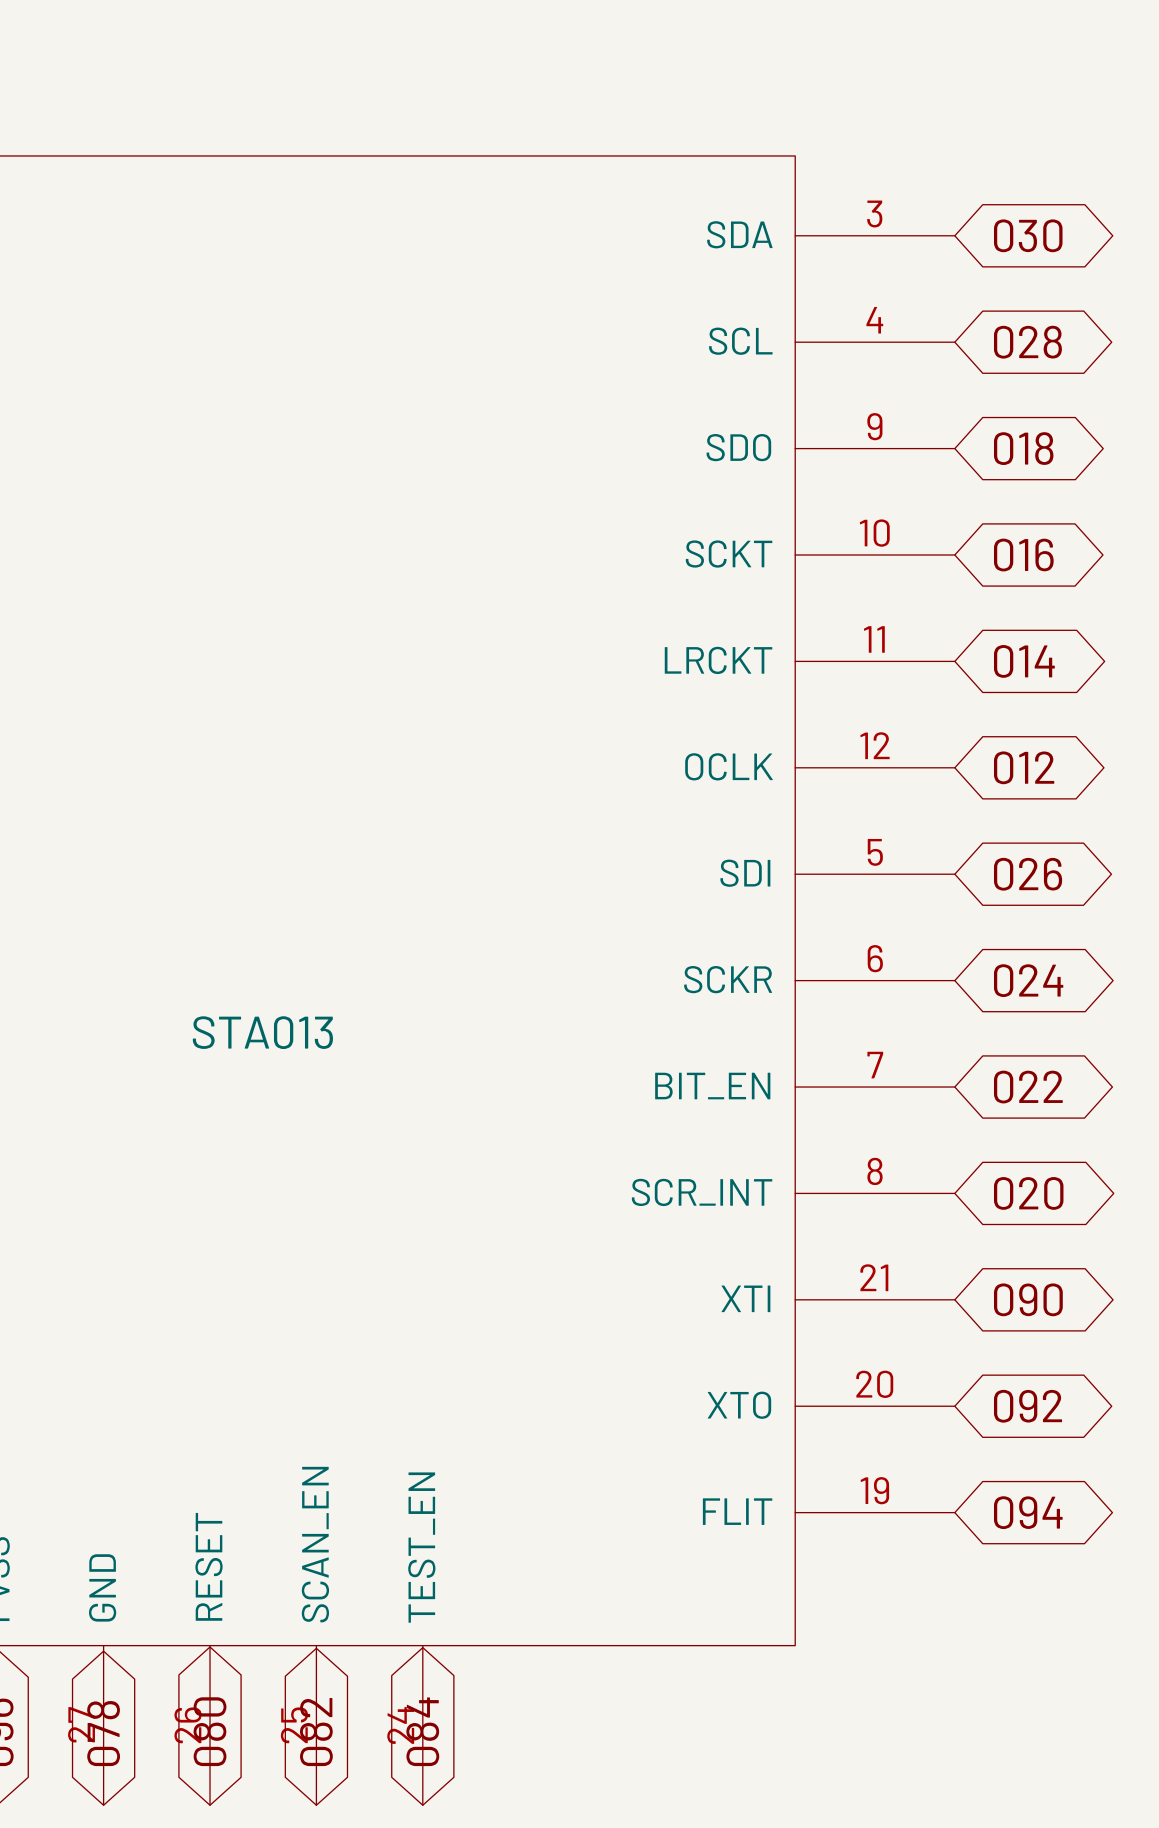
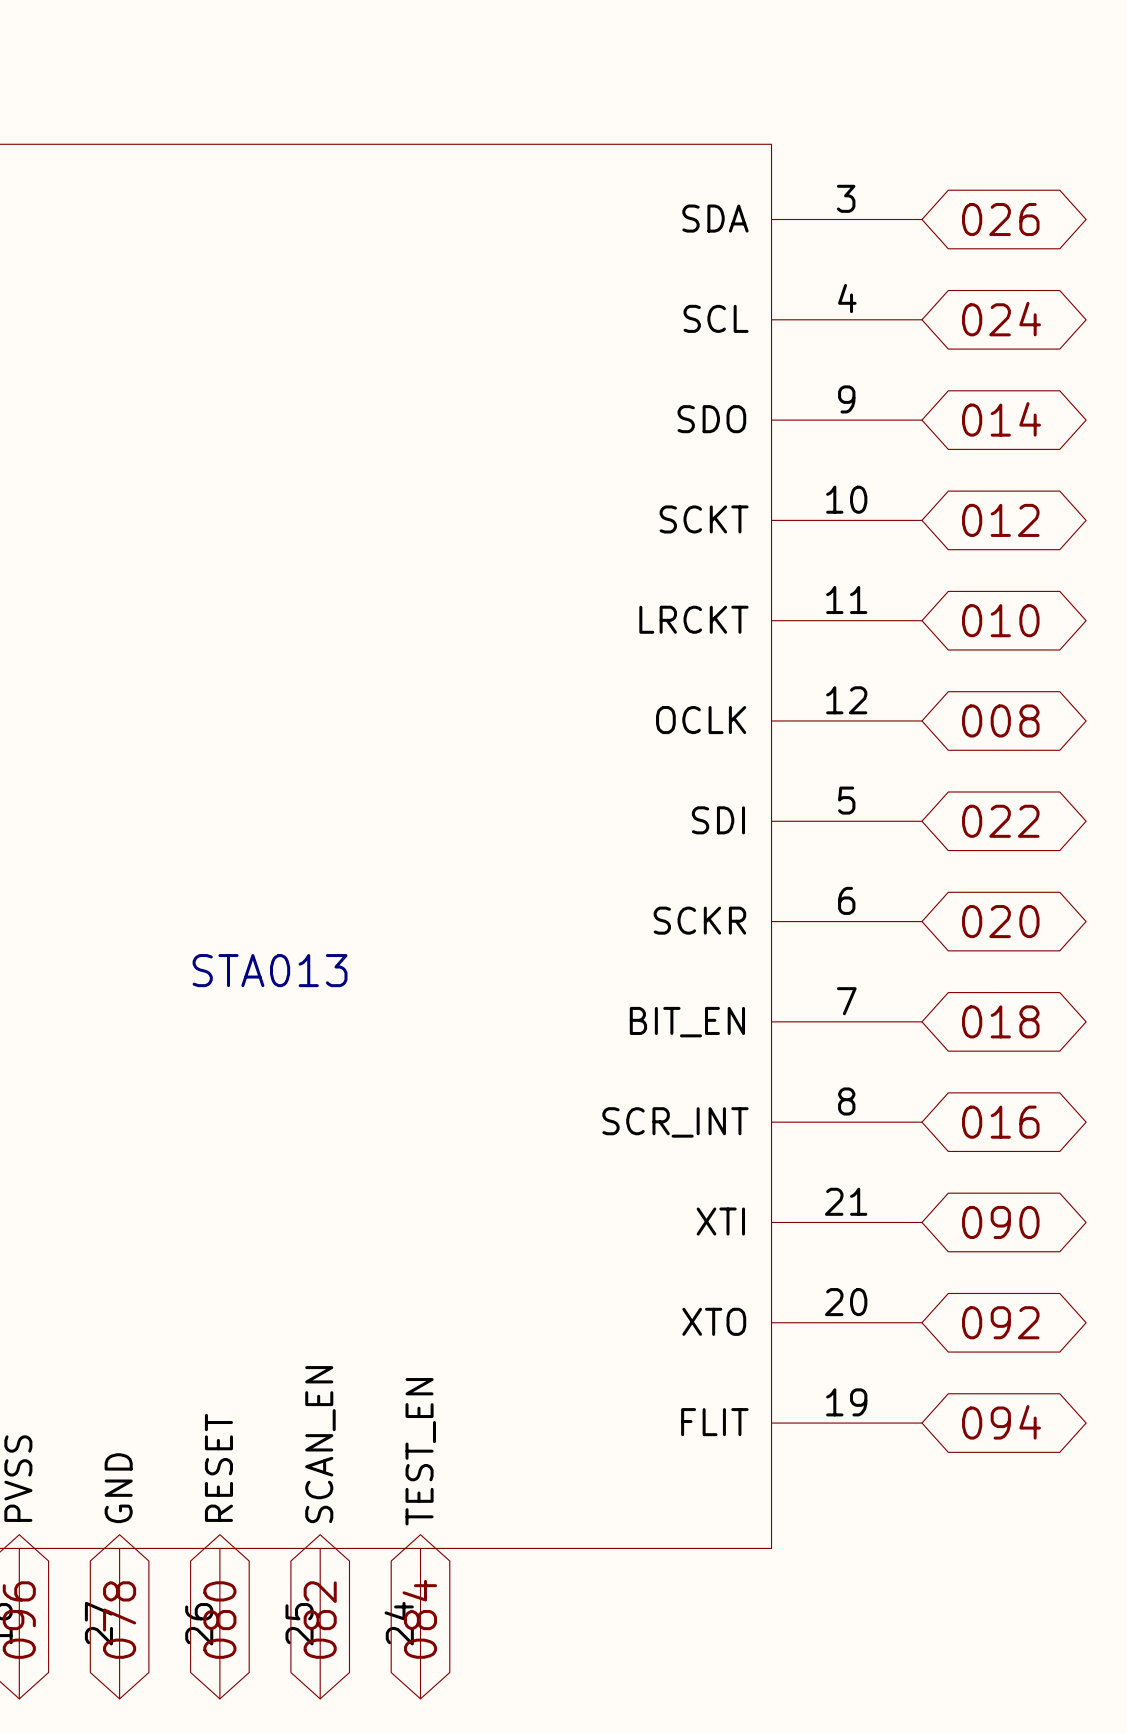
global label: 030 (1028, 235) -> 026 (1000, 219)
global label: 028 (1027, 342) -> 024 (1001, 319)
global label: 018 (1023, 448) -> 014 (1001, 419)
global label: 016 (1023, 555) -> 012 (1000, 520)
global label: 014 (1024, 661) -> 010 (1000, 620)
global label: 012 (1024, 767) -> 008 (1000, 720)
global label: 026 (1028, 874) -> 022 (1000, 821)
global label: 024 (1028, 980) -> 020 (1000, 921)
global label: 022 (1028, 1087) -> 018 (1000, 1021)
global label: 020 (1028, 1193) -> 016 (1000, 1122)

